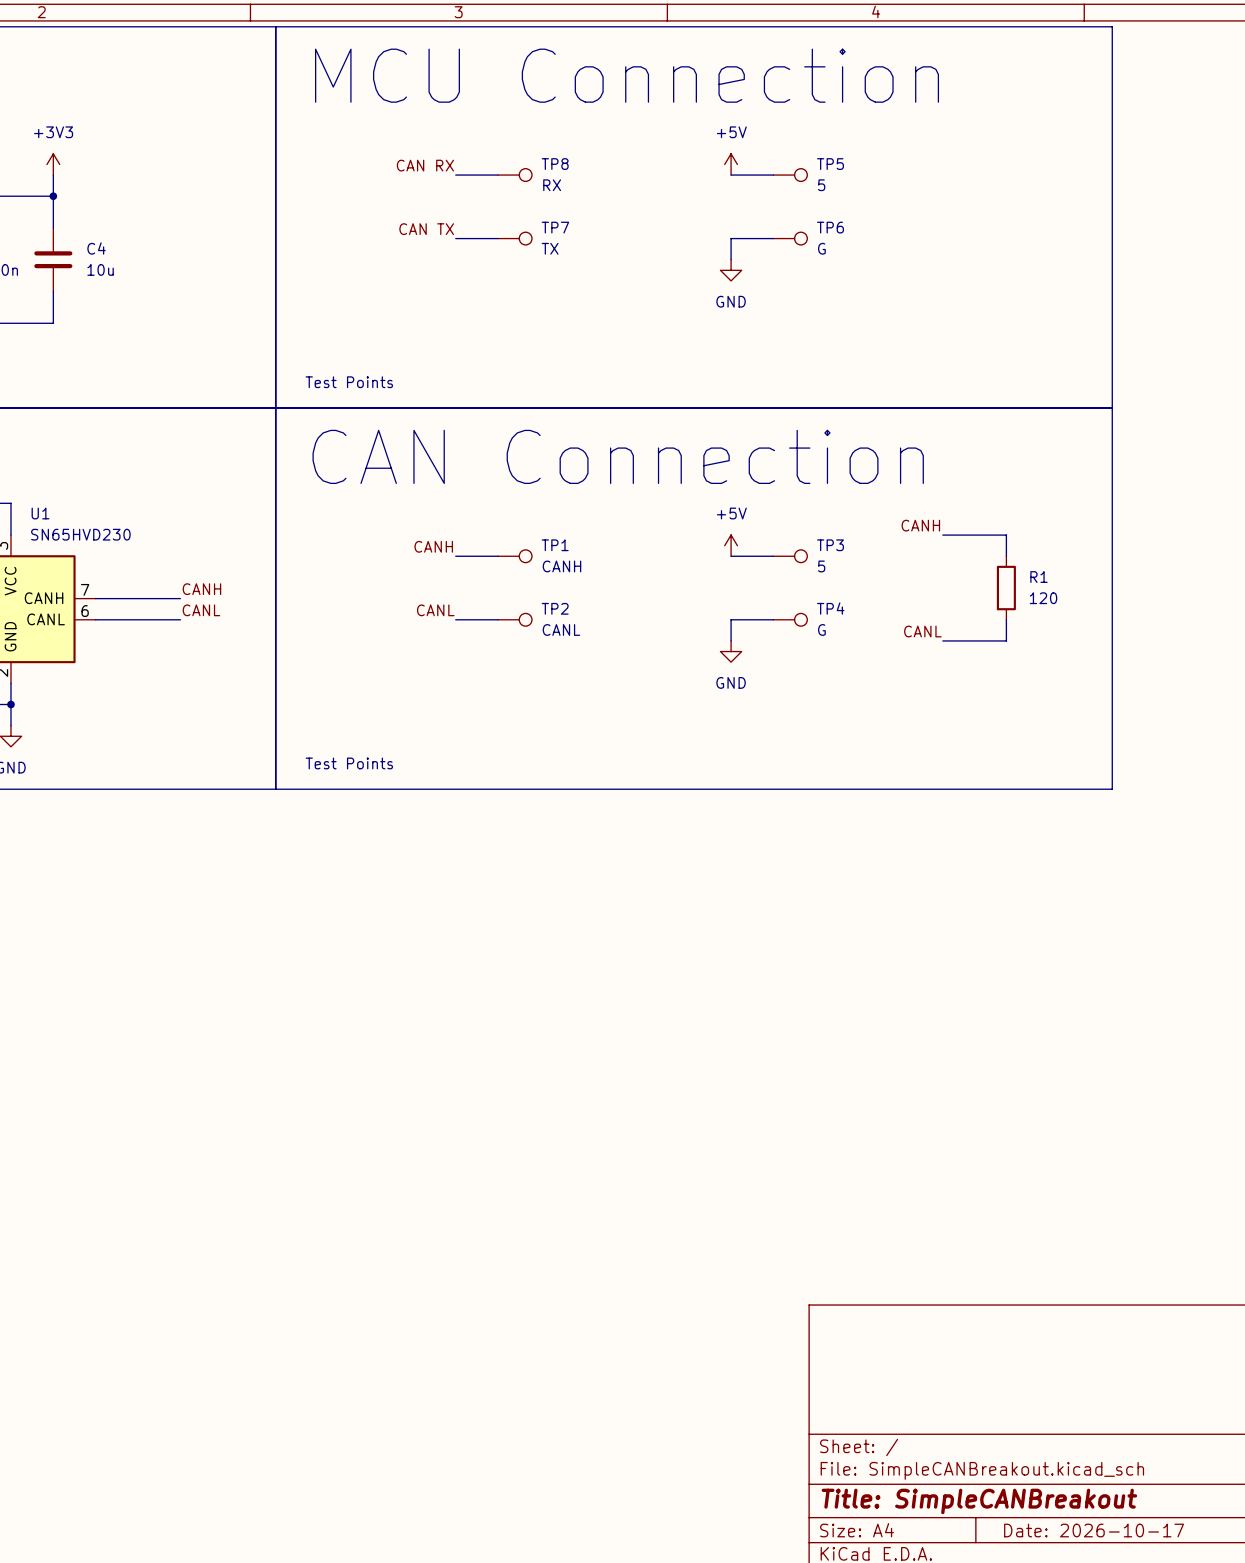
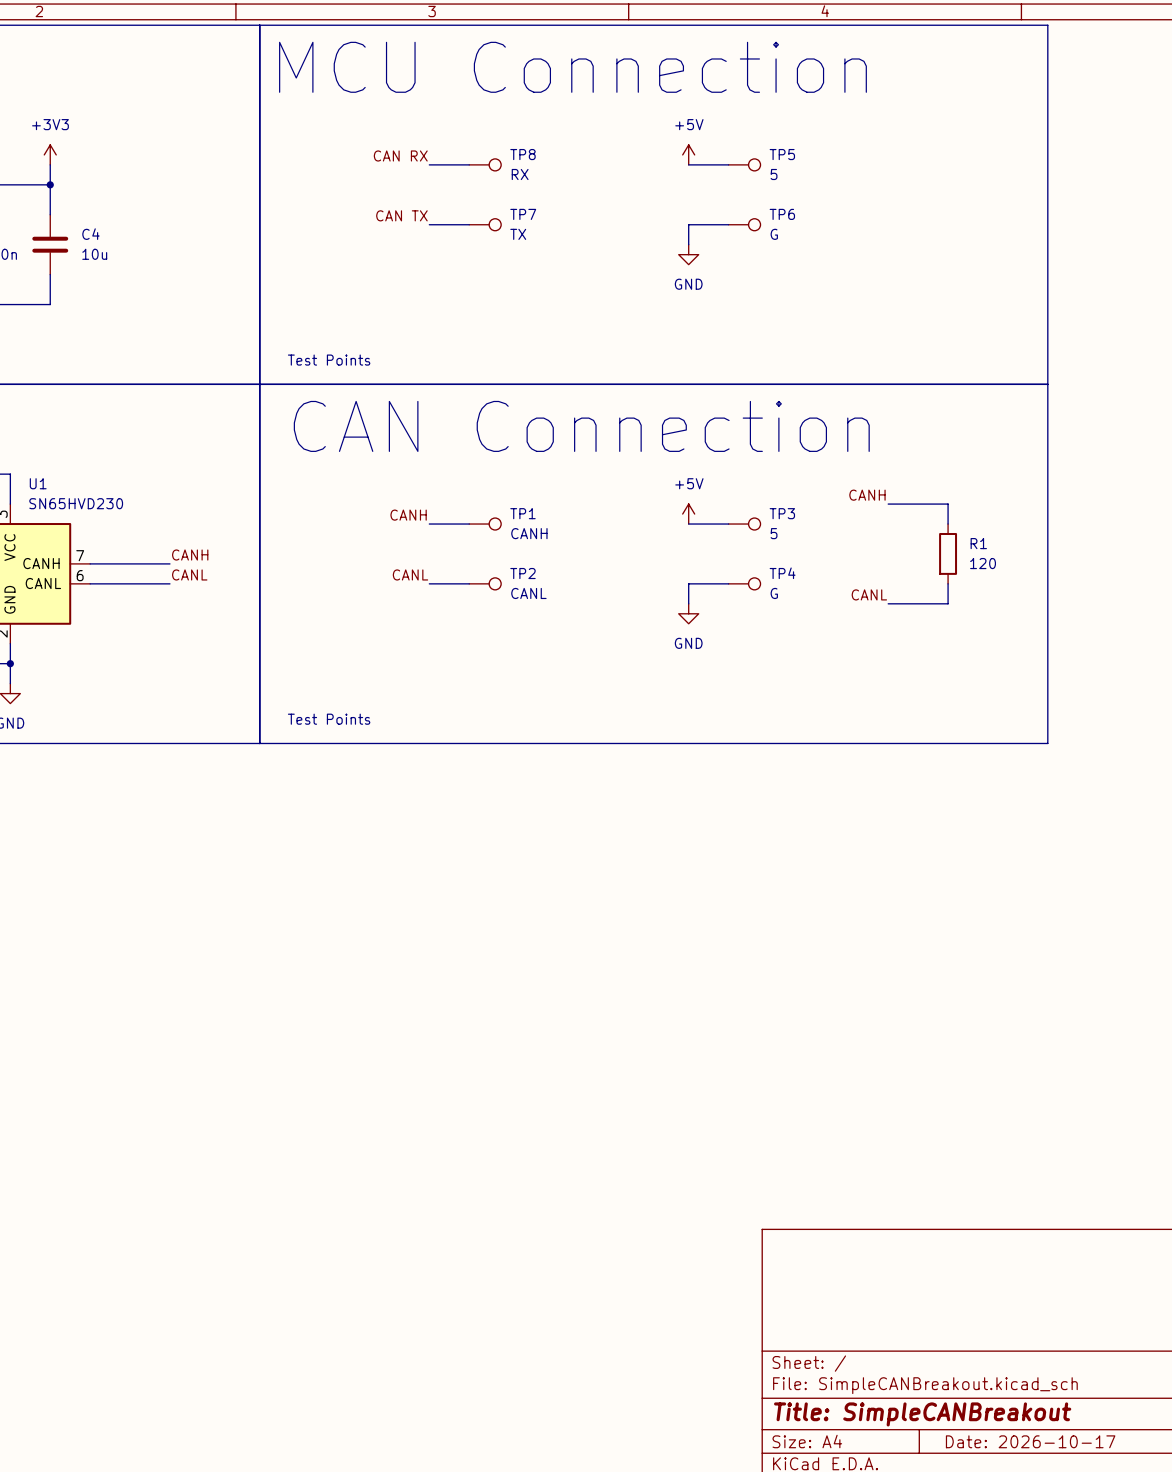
text: none -> MCU Connection (572, 67)
text: MCU Connection (627, 75) -> none
text: none -> CAN Connection (581, 426)
text: CAN Connection (618, 456) -> none

